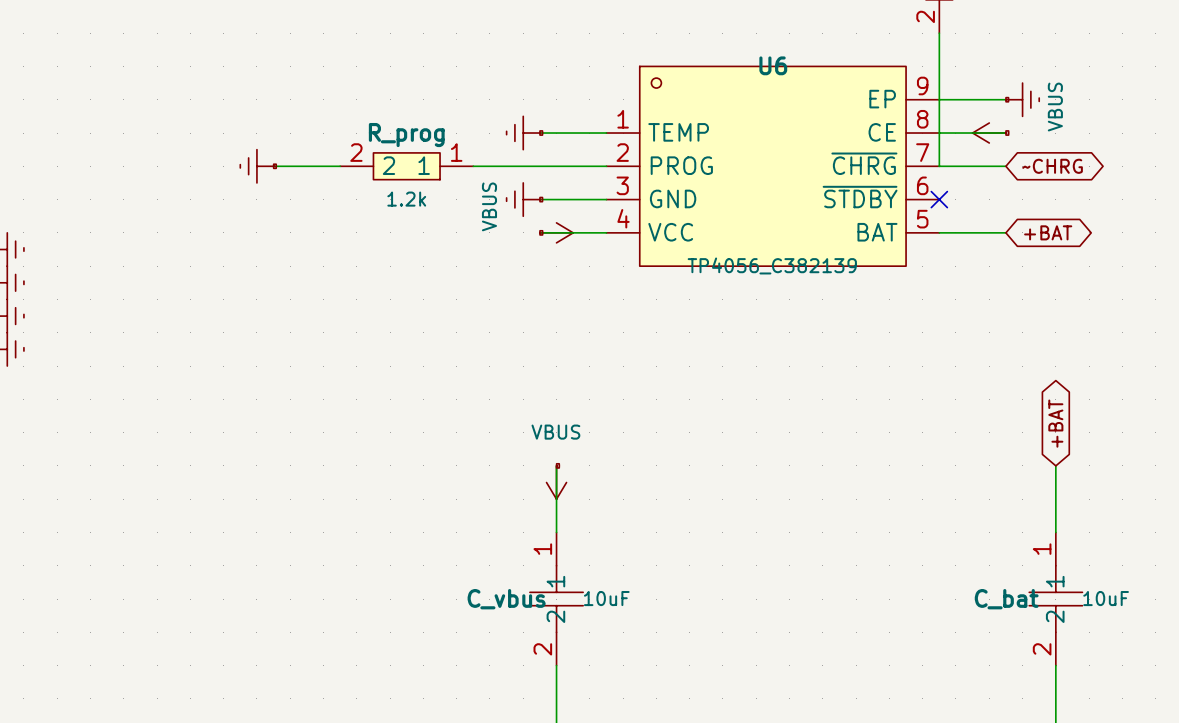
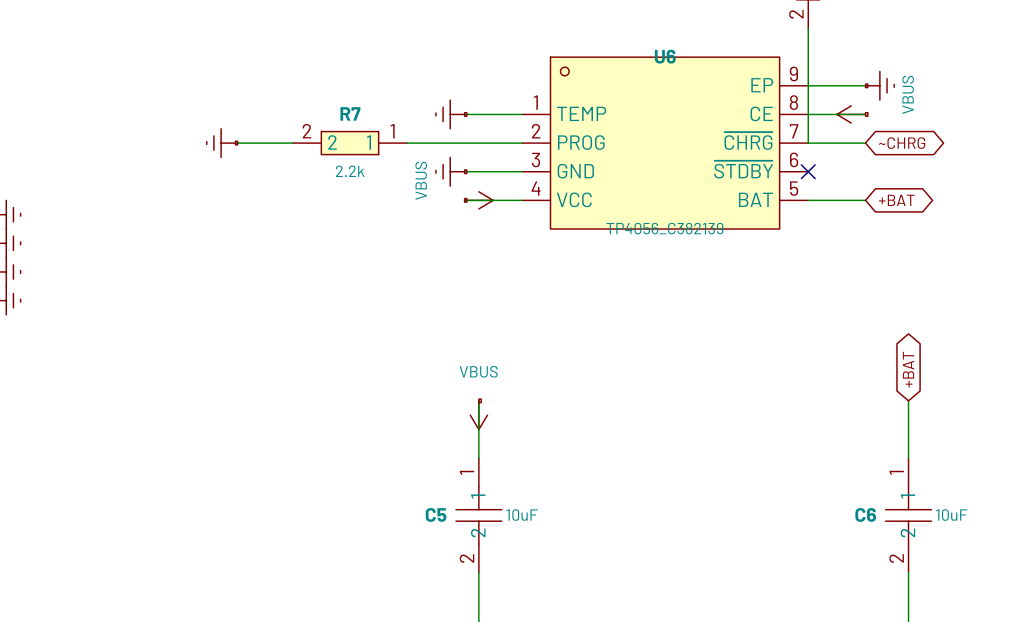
R_prog name: R_prog (406, 135) -> R7 (350, 113)
R_prog value: 1.2k (406, 199) -> 2.2k (350, 171)
C_vbus name: C_vbus (506, 599) -> C5 (436, 514)
C_bat name: C_bat (1006, 599) -> C6 (865, 514)

